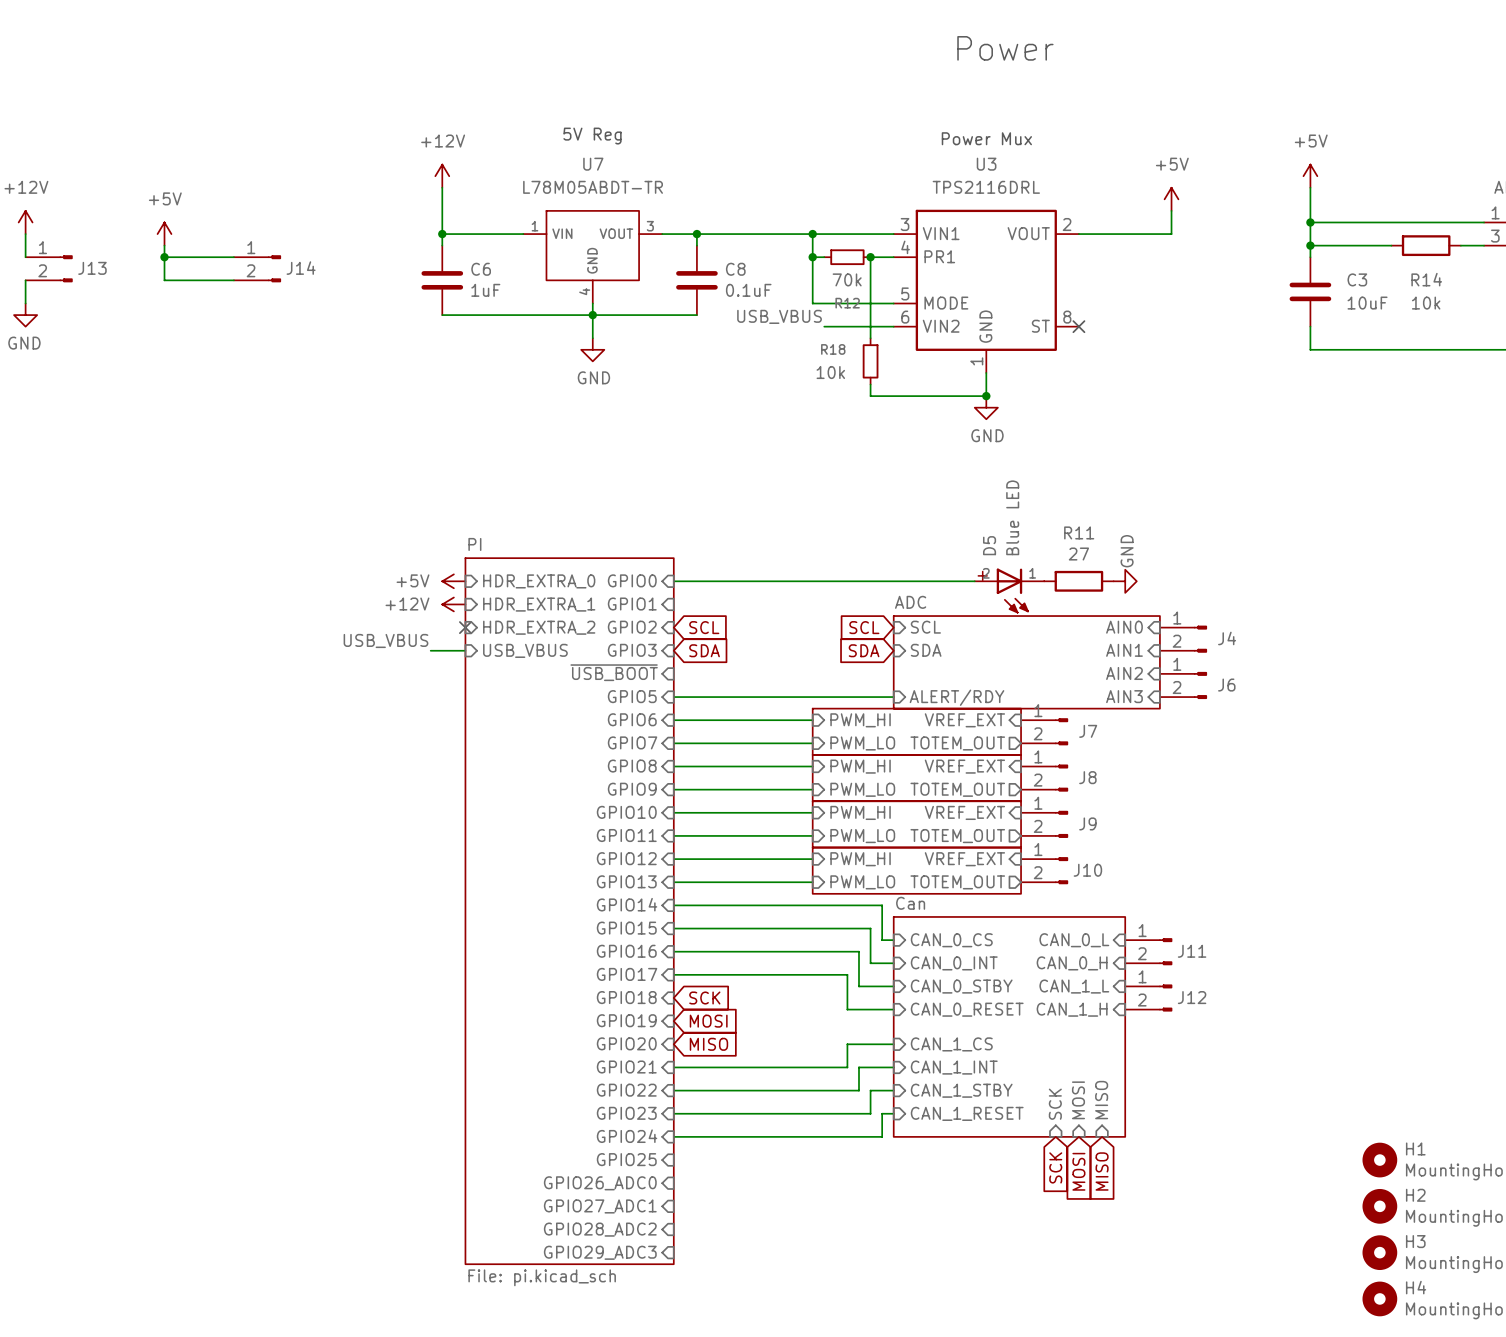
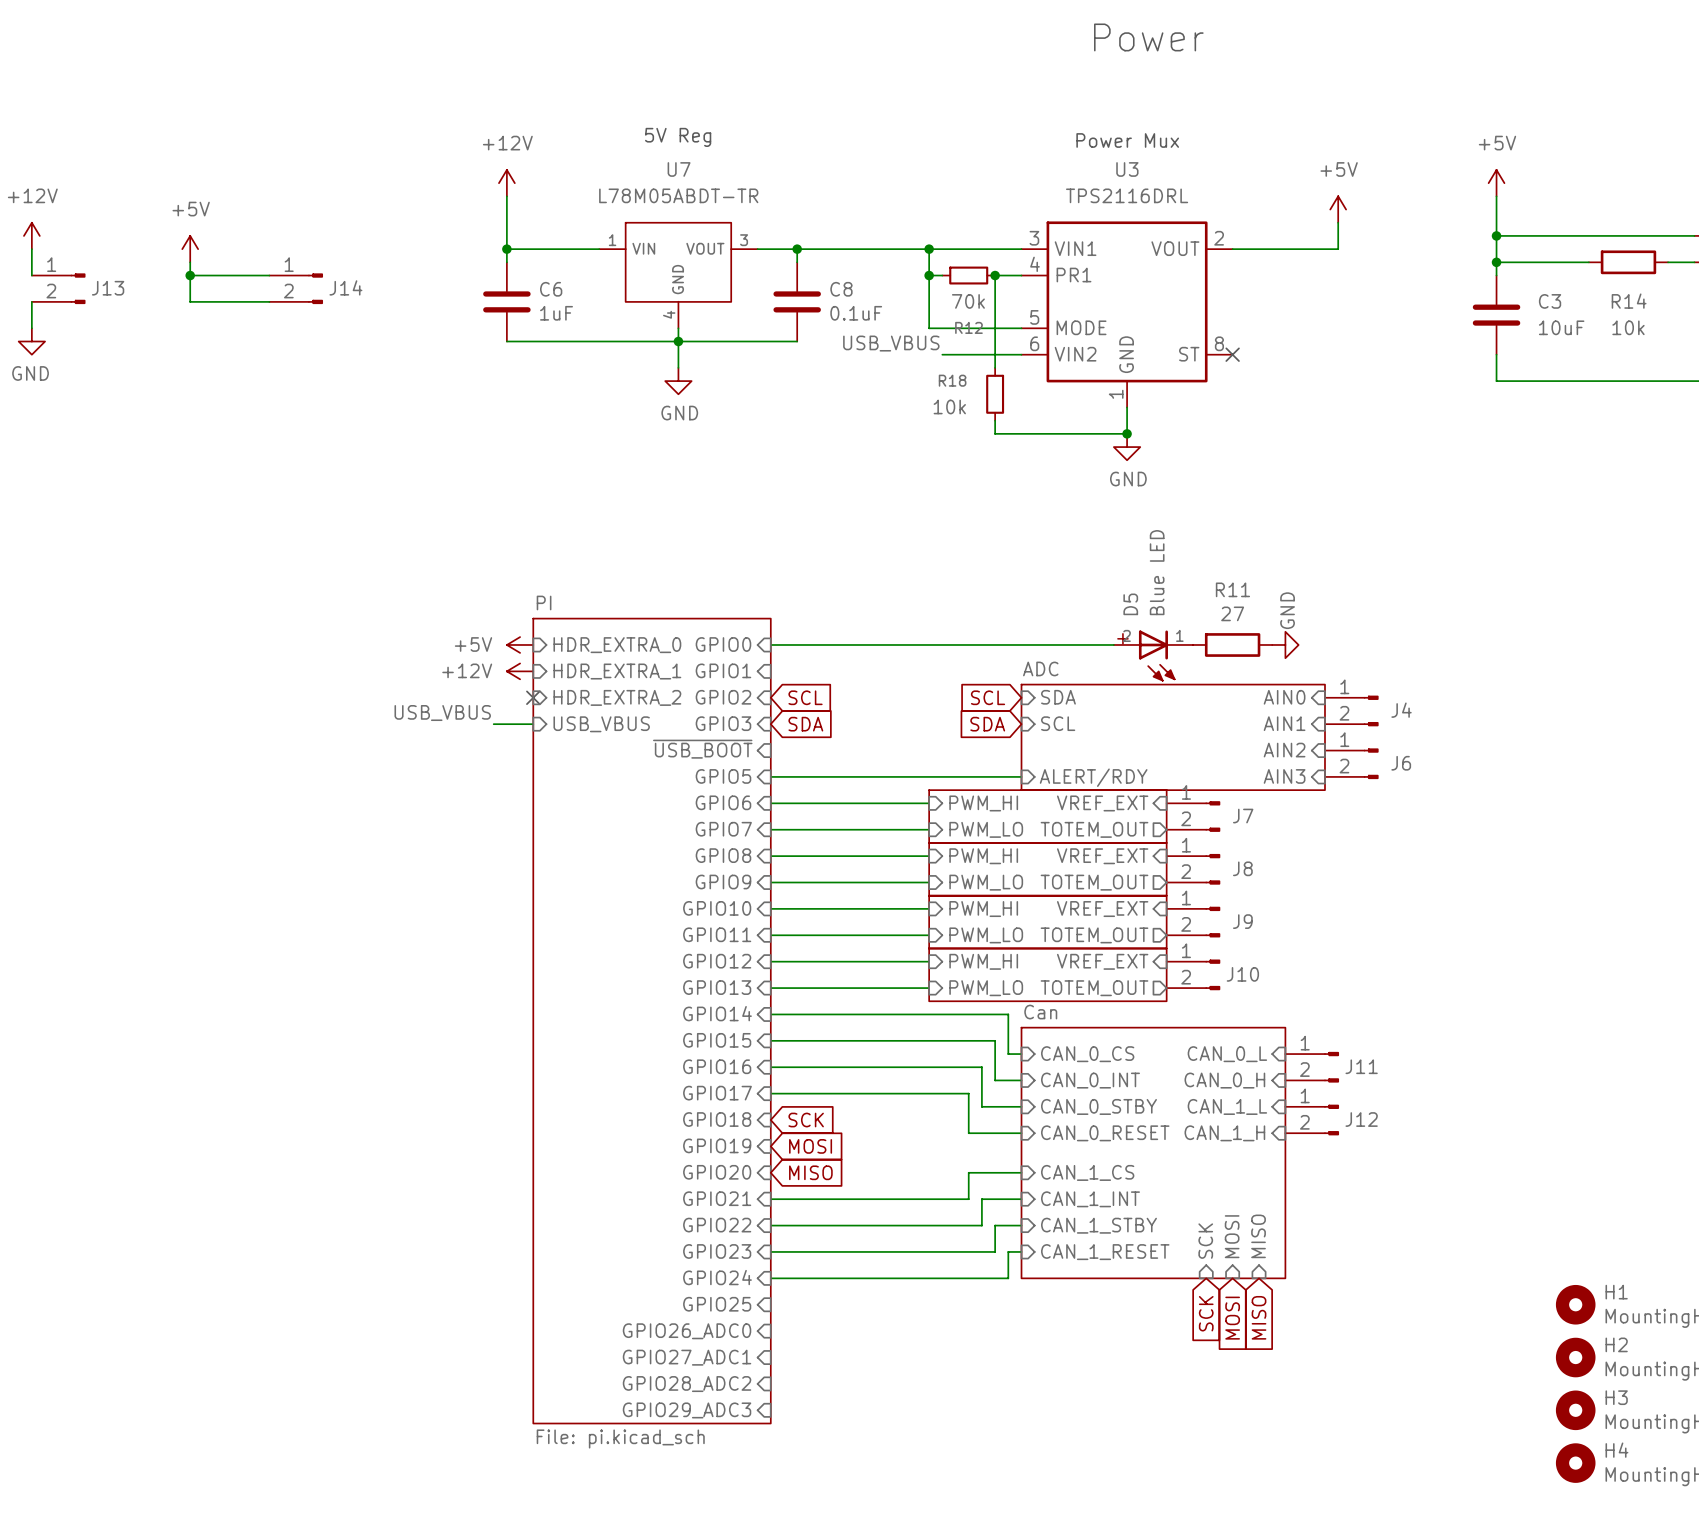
sheet pin: SCL (925, 627) -> SDA (1058, 697)
sheet pin: SDA (926, 650) -> SCL (1058, 723)

